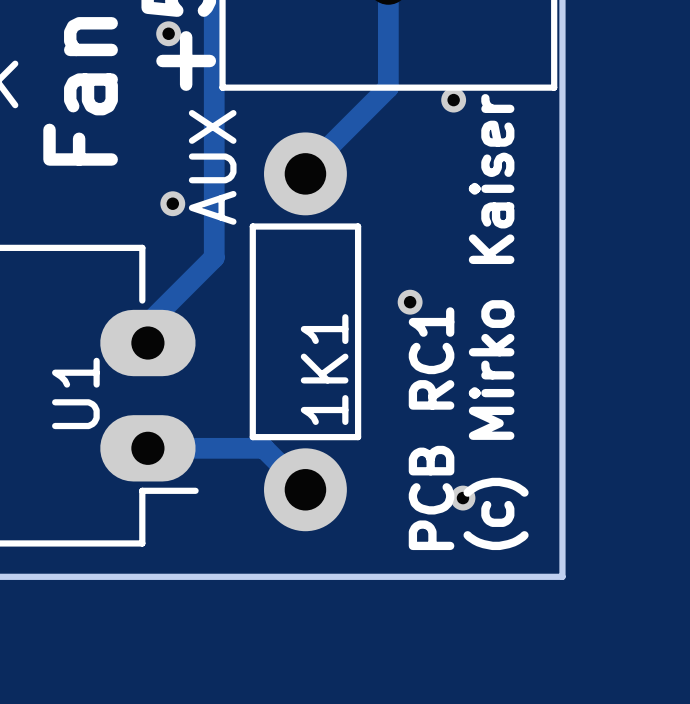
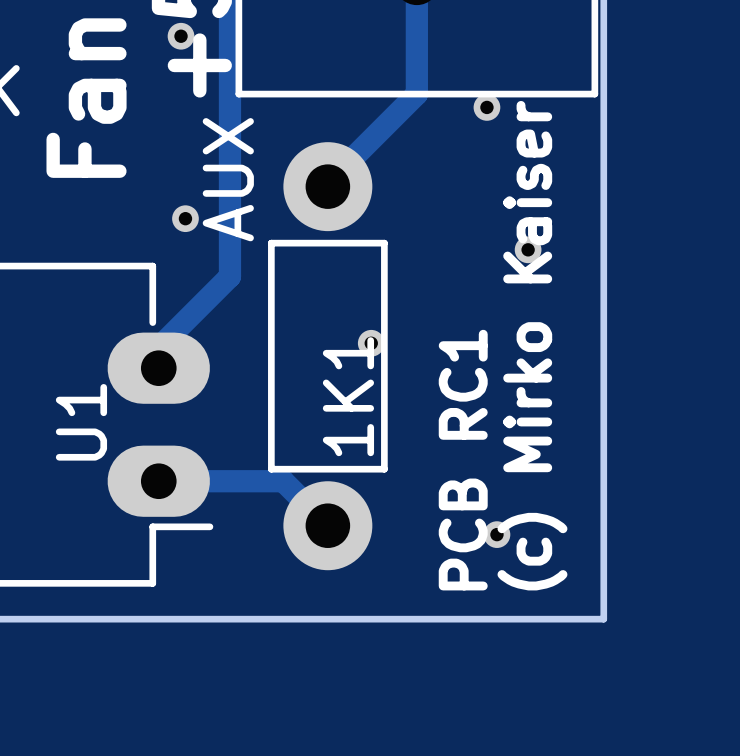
part: none -> (528, 249)
part: (410, 302) -> none
part: none -> (371, 343)

